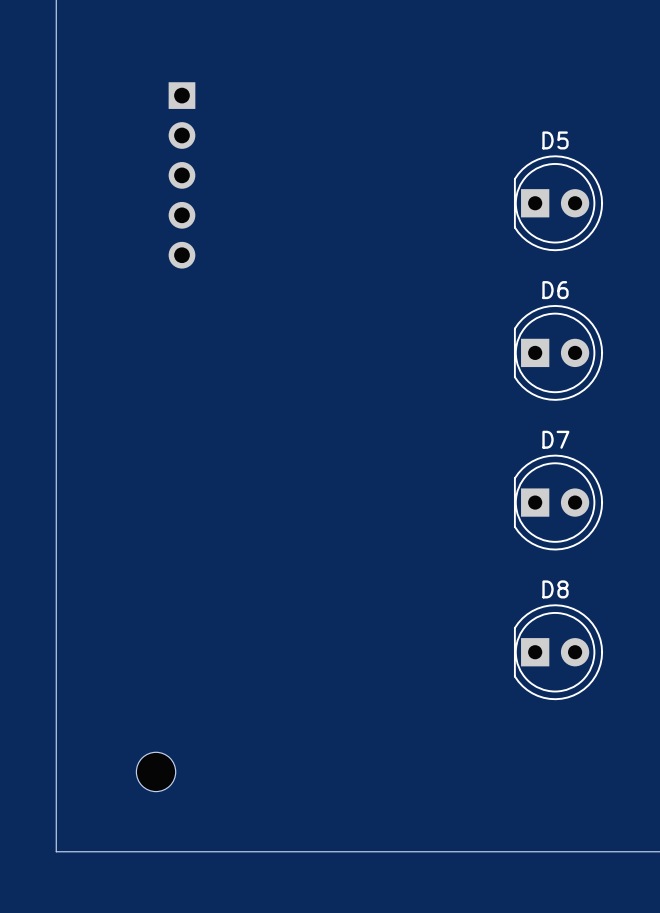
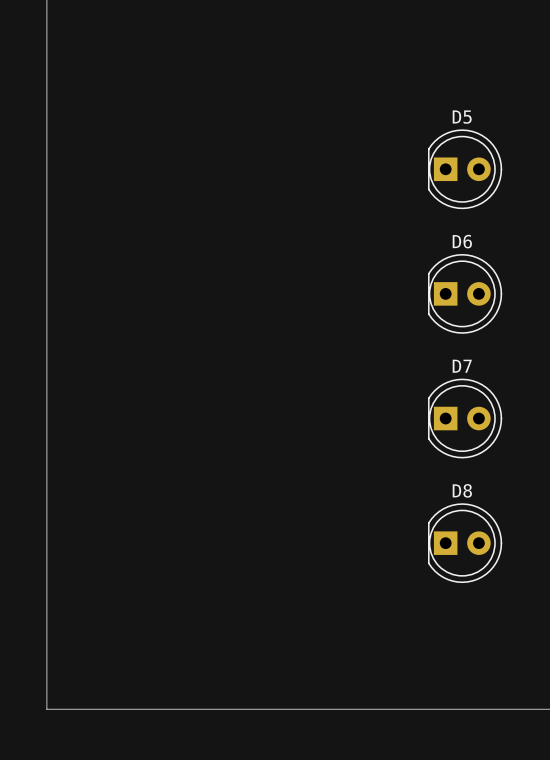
part: (181, 175) -> none
part: (156, 771) -> none

